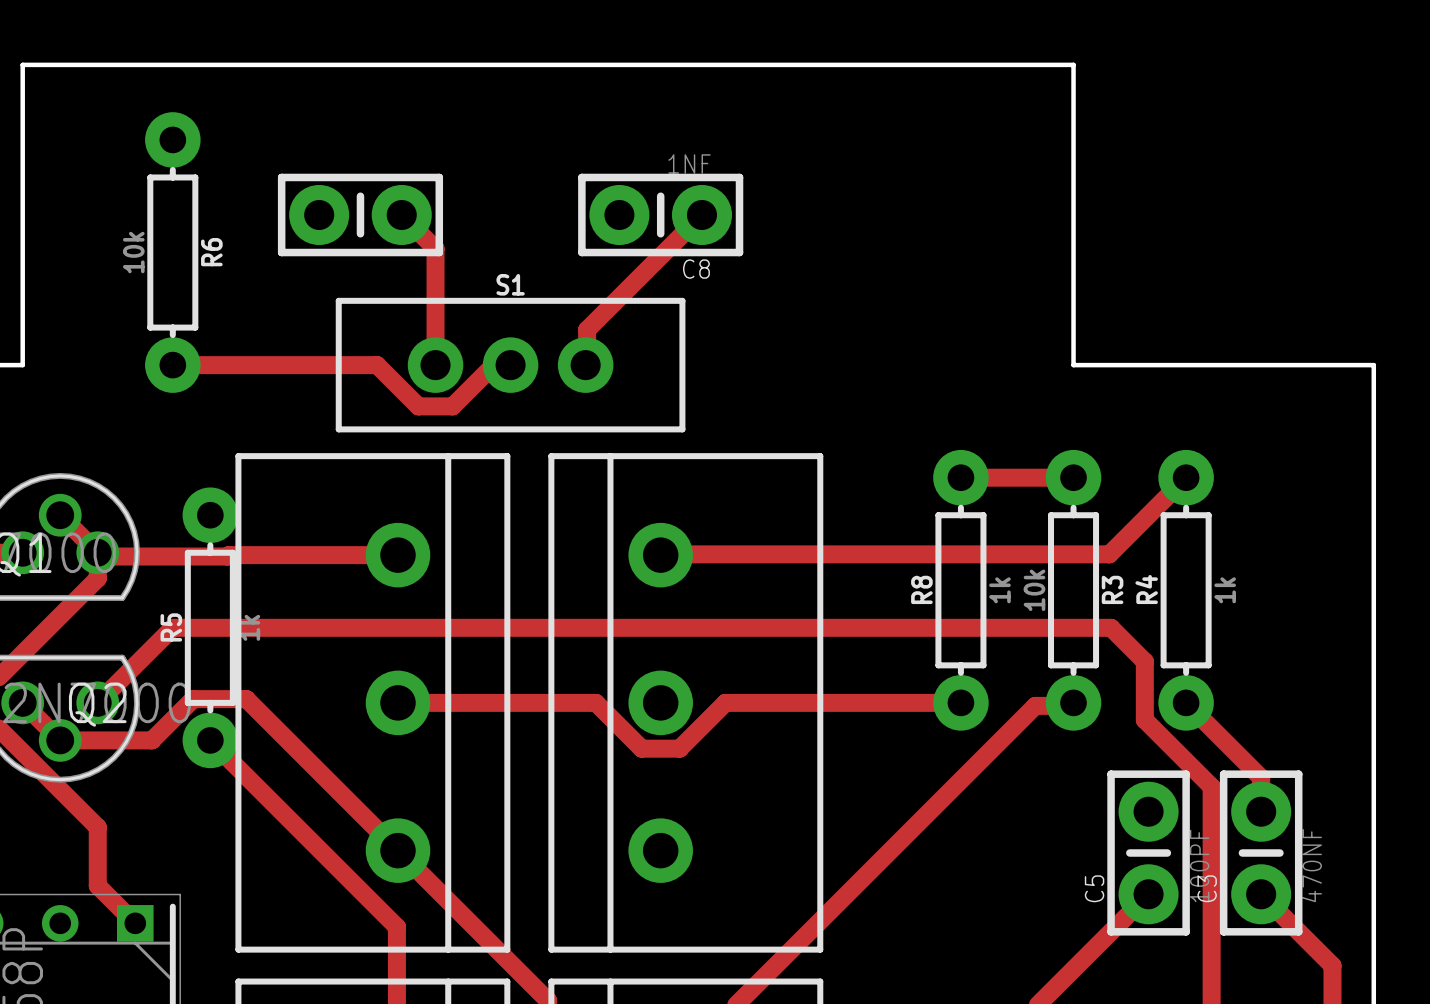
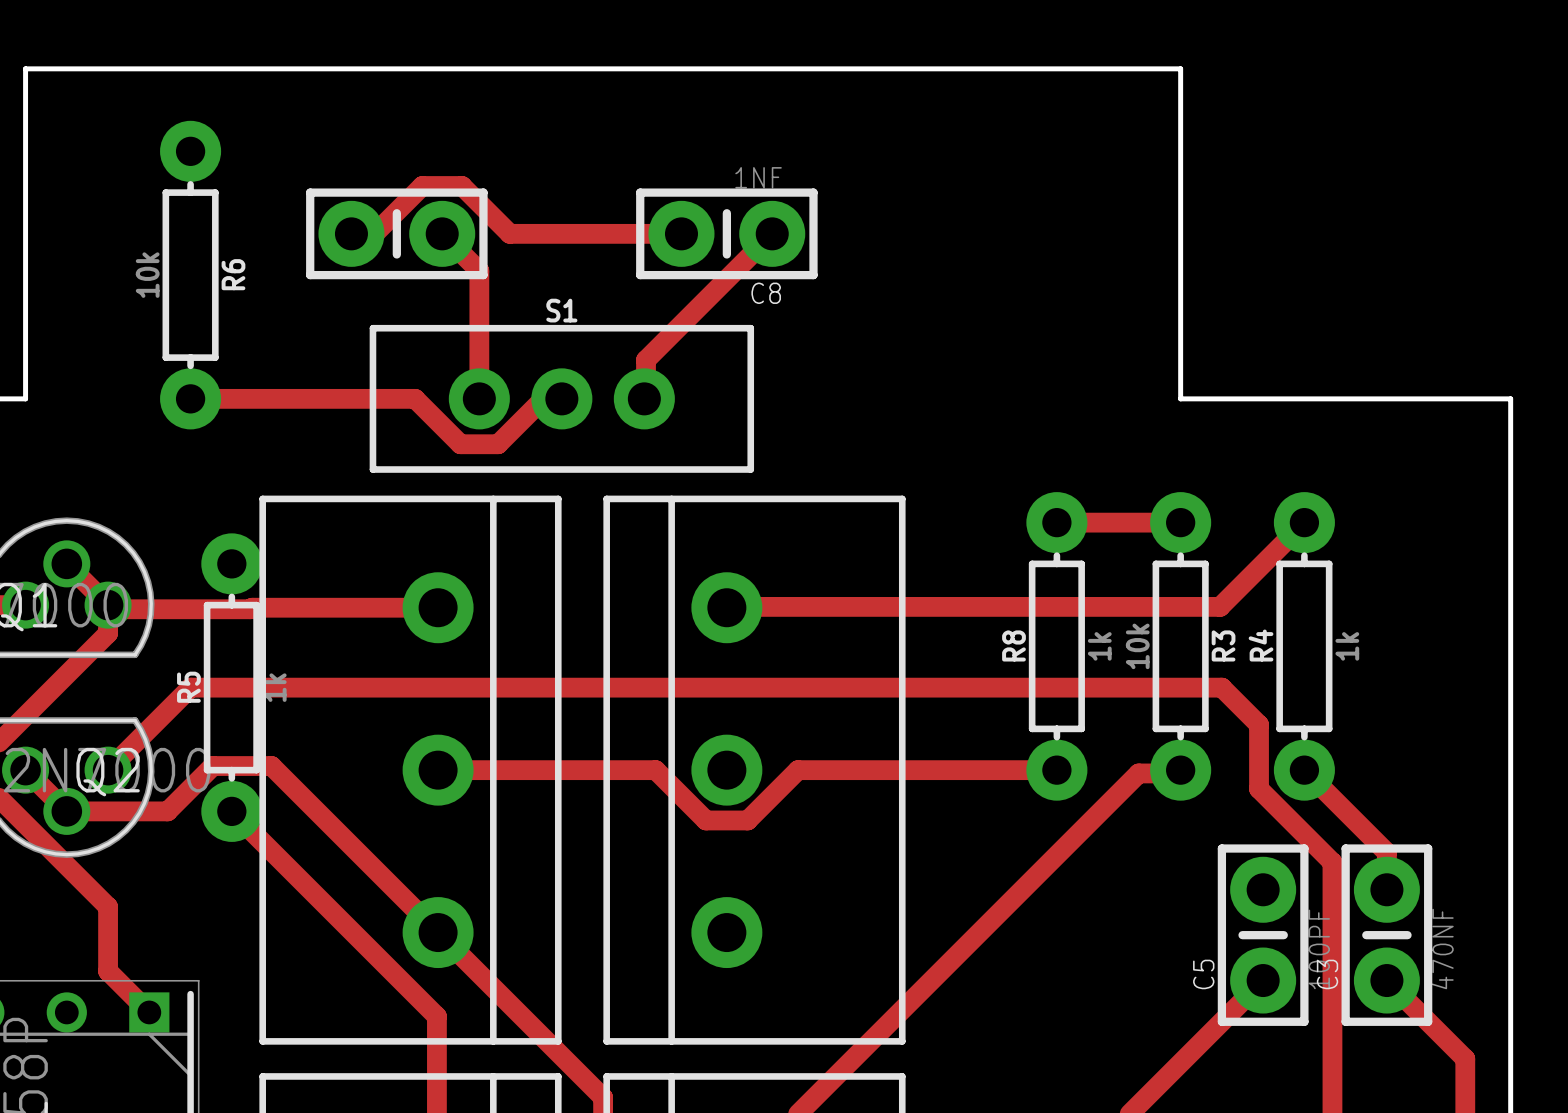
track: none -> (351, 233) (374, 233) (422, 186) (462, 186) (509, 233) (681, 233)

